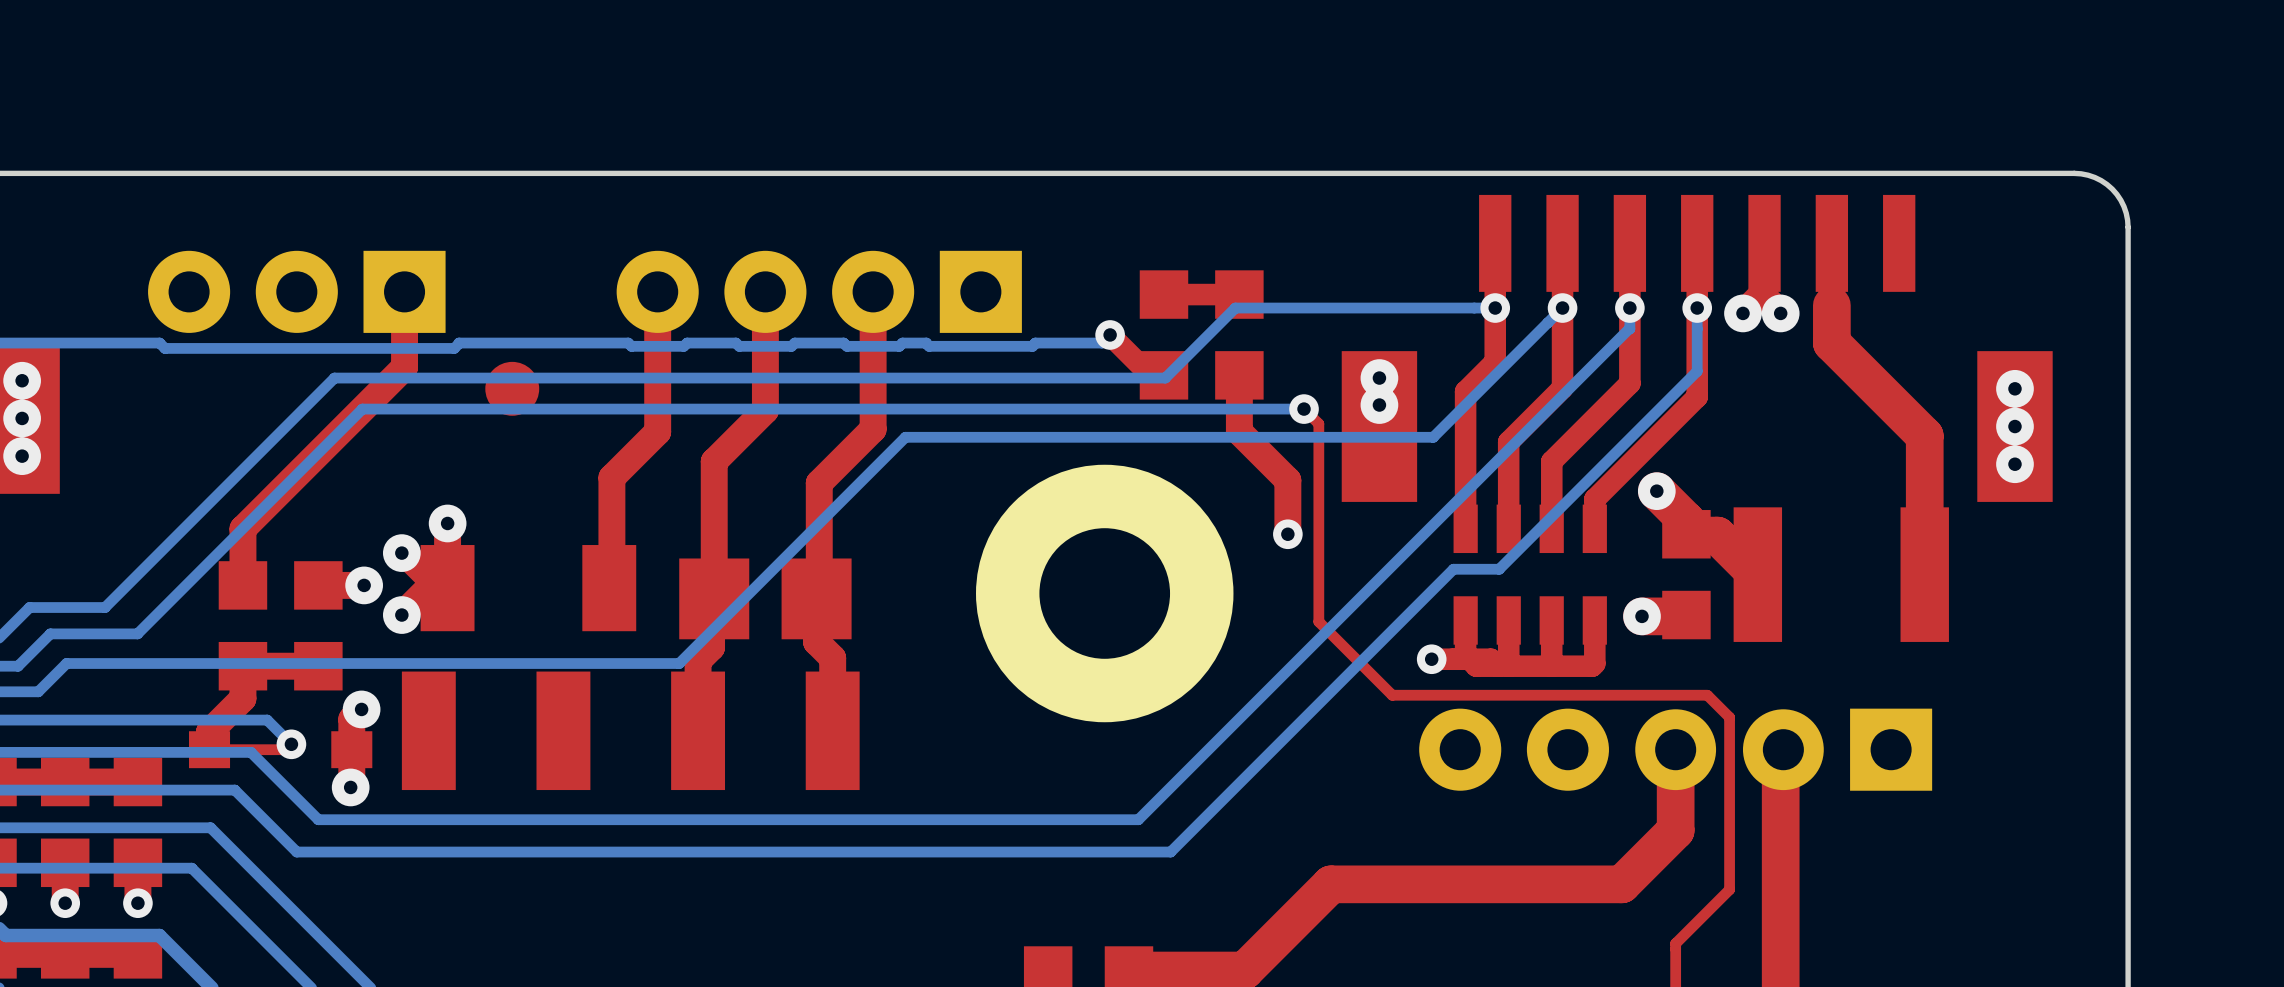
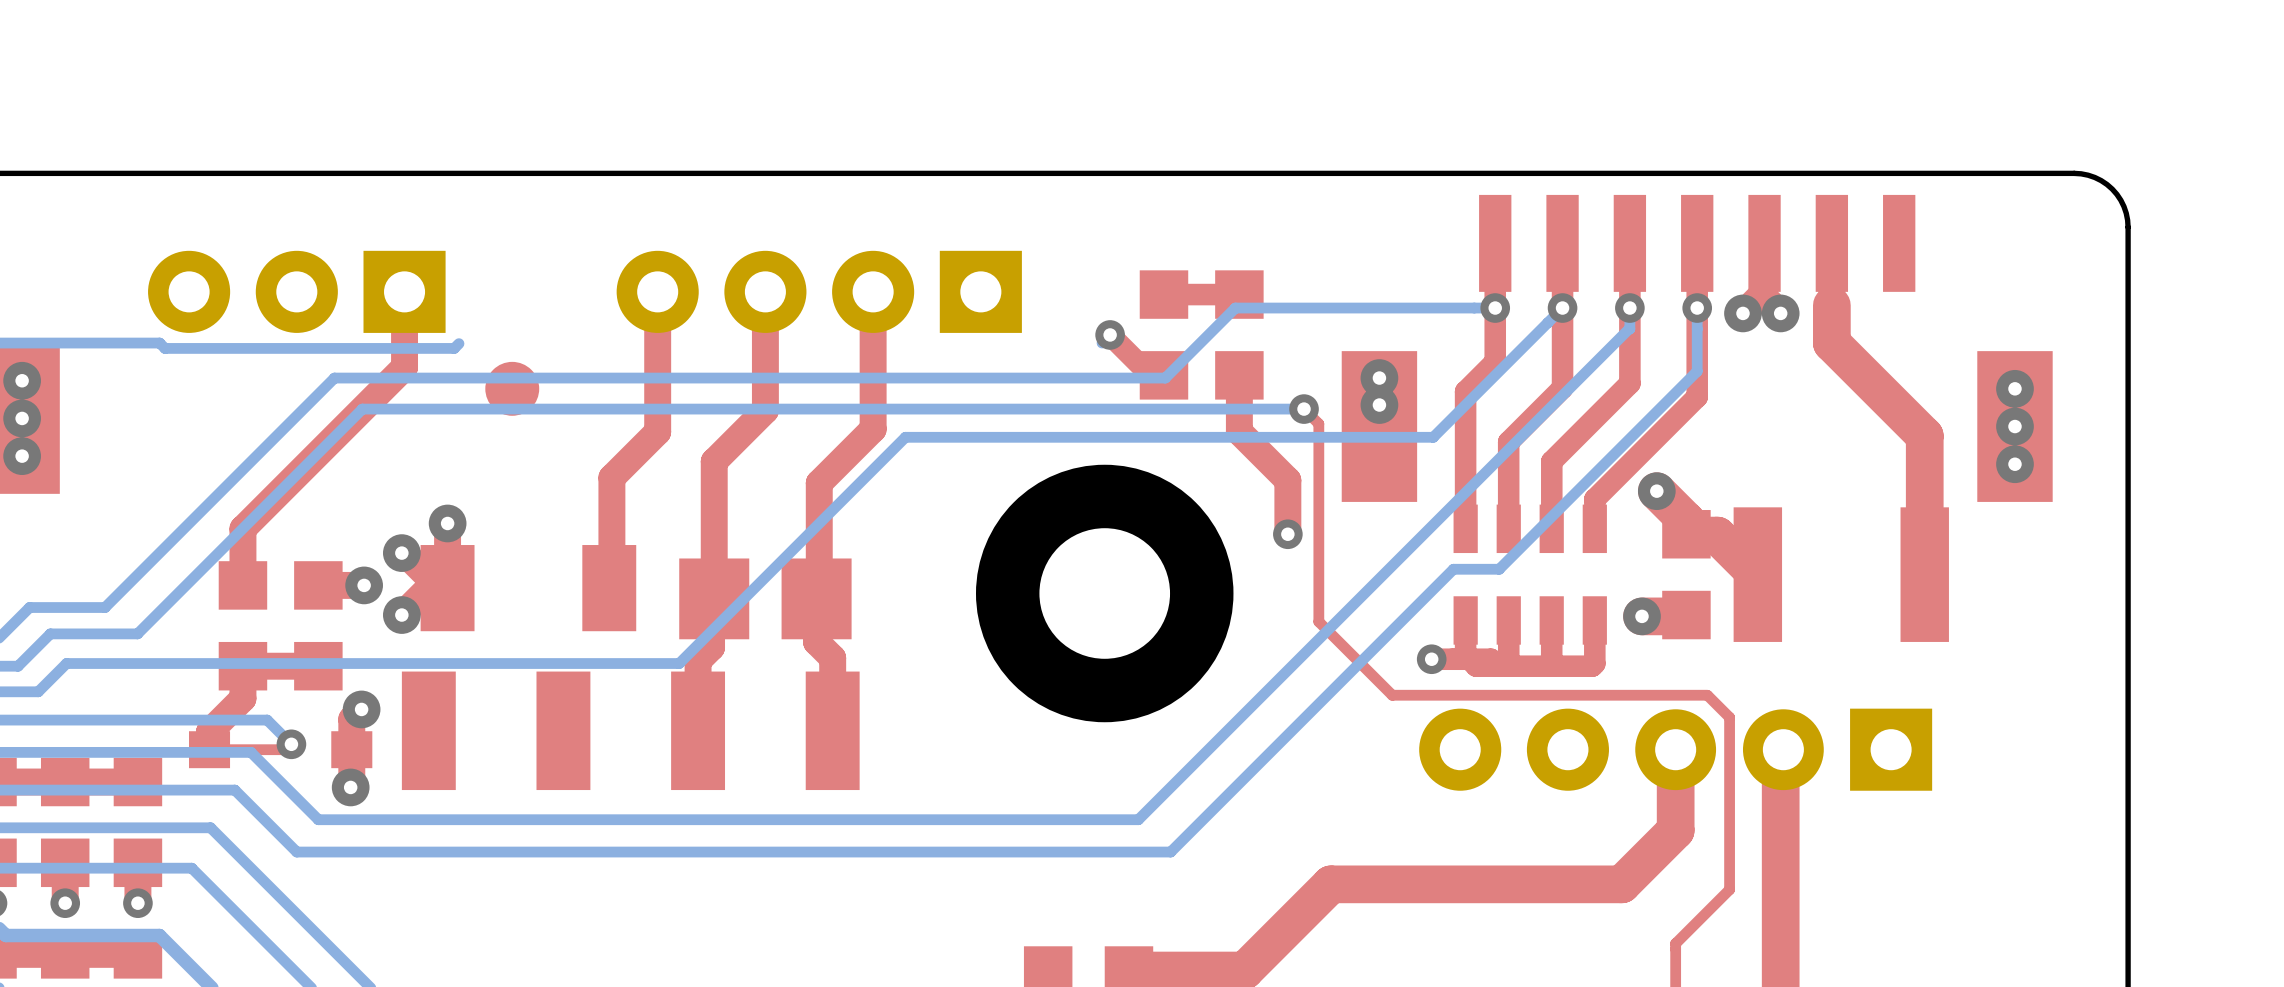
bottom track: (926, 343) (902, 343) (899, 346) (846, 346) (843, 343) (794, 343) (791, 346) (739, 346) (735, 343) (687, 343) (683, 346) (631, 346) (628, 343) (458, 343) -> none
bottom track: (1035, 343) (1032, 346) (929, 346) (926, 343) -> none
bottom track: (1102, 343) (1035, 343) -> none

